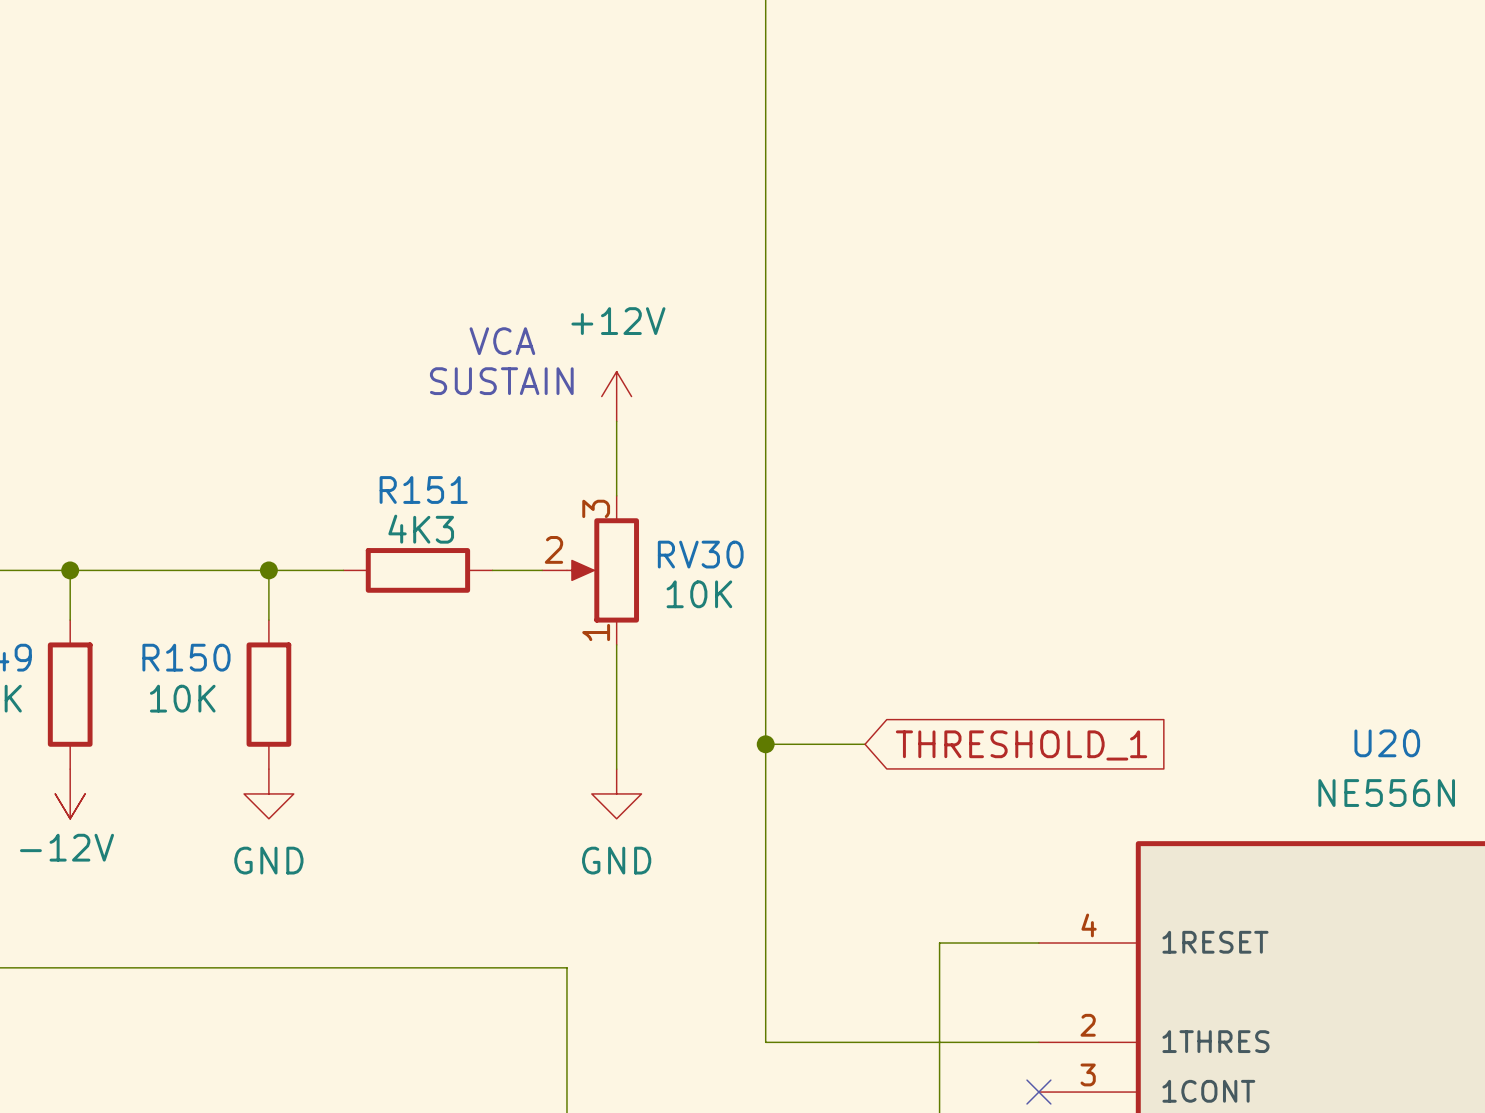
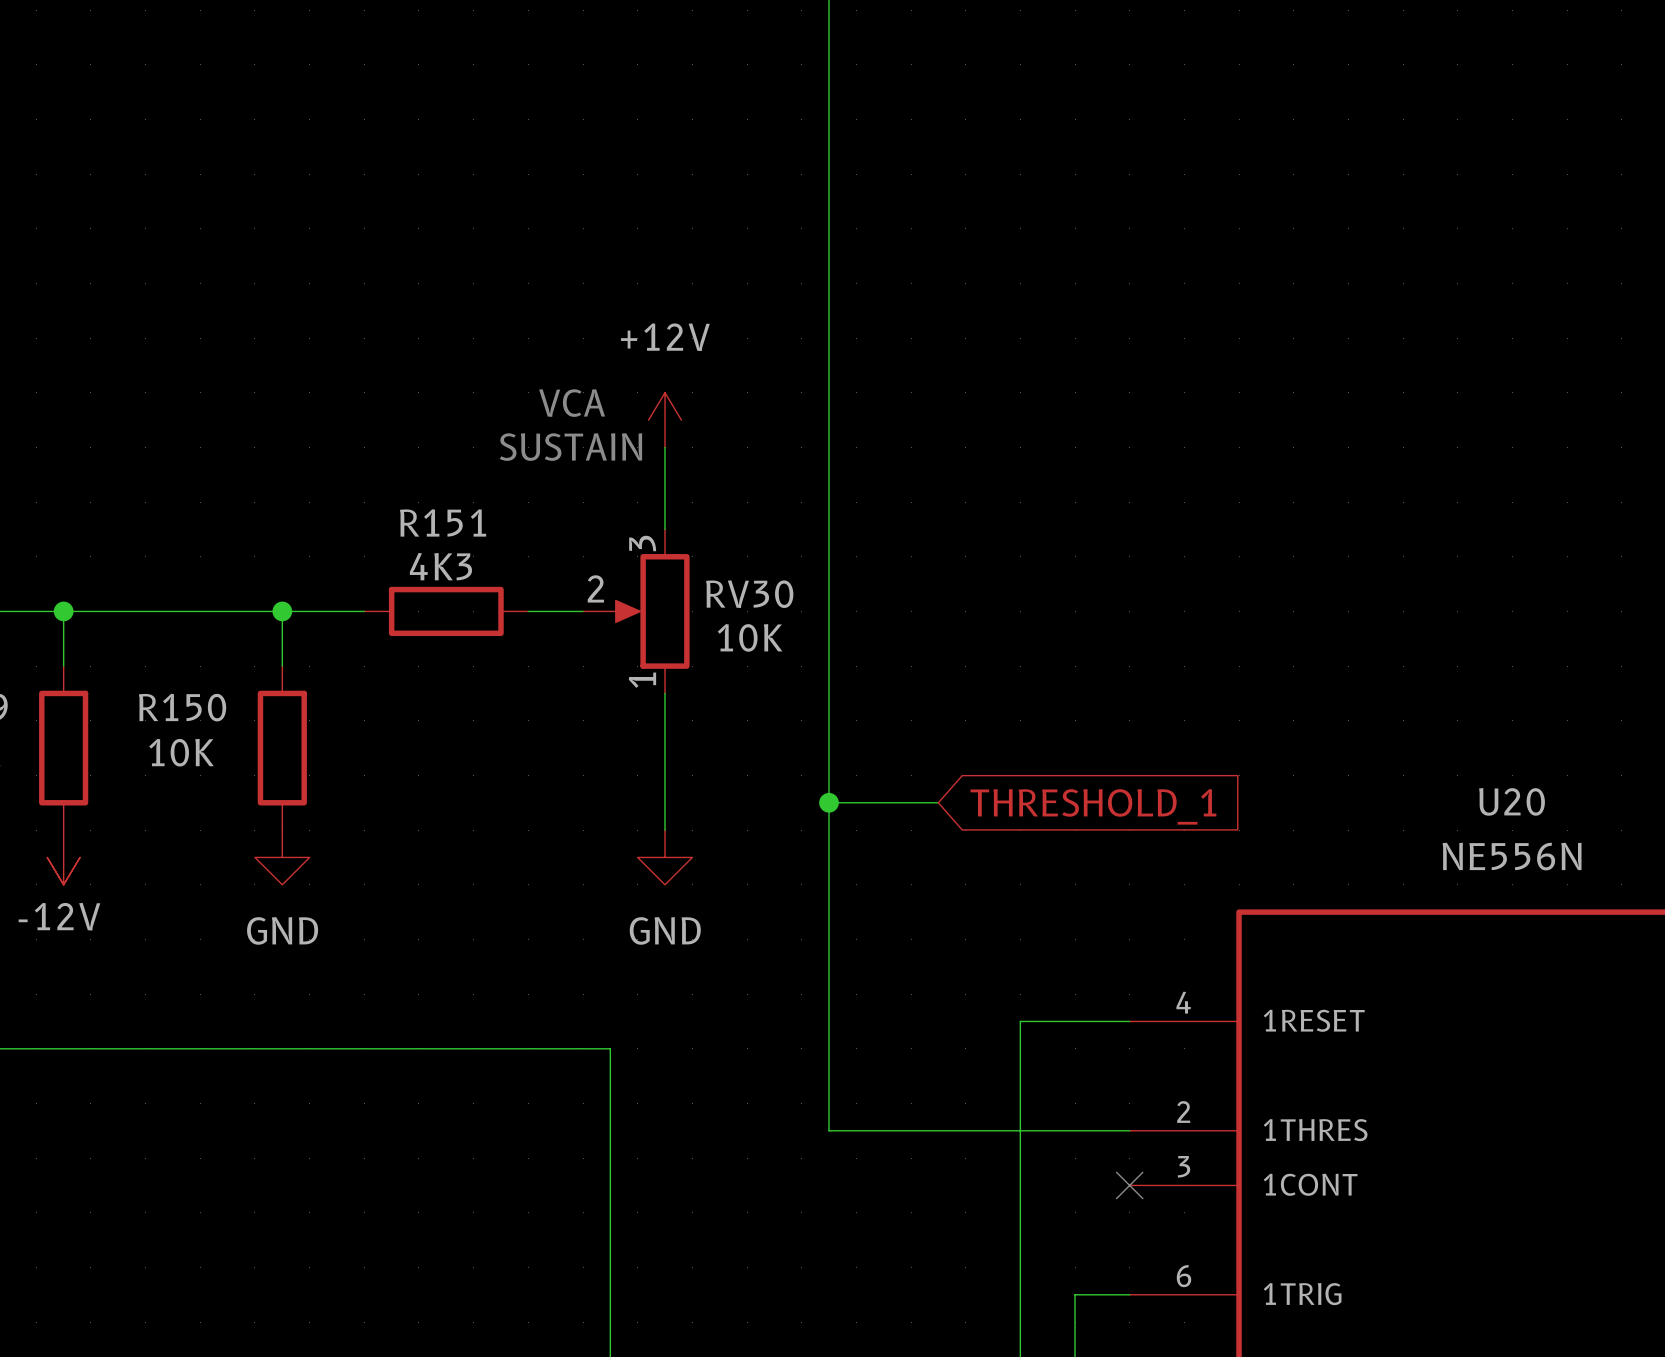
text position: VCA (502, 341) -> VCA (572, 403)
text position: SUSTAIN (501, 381) -> SUSTAIN (570, 447)

